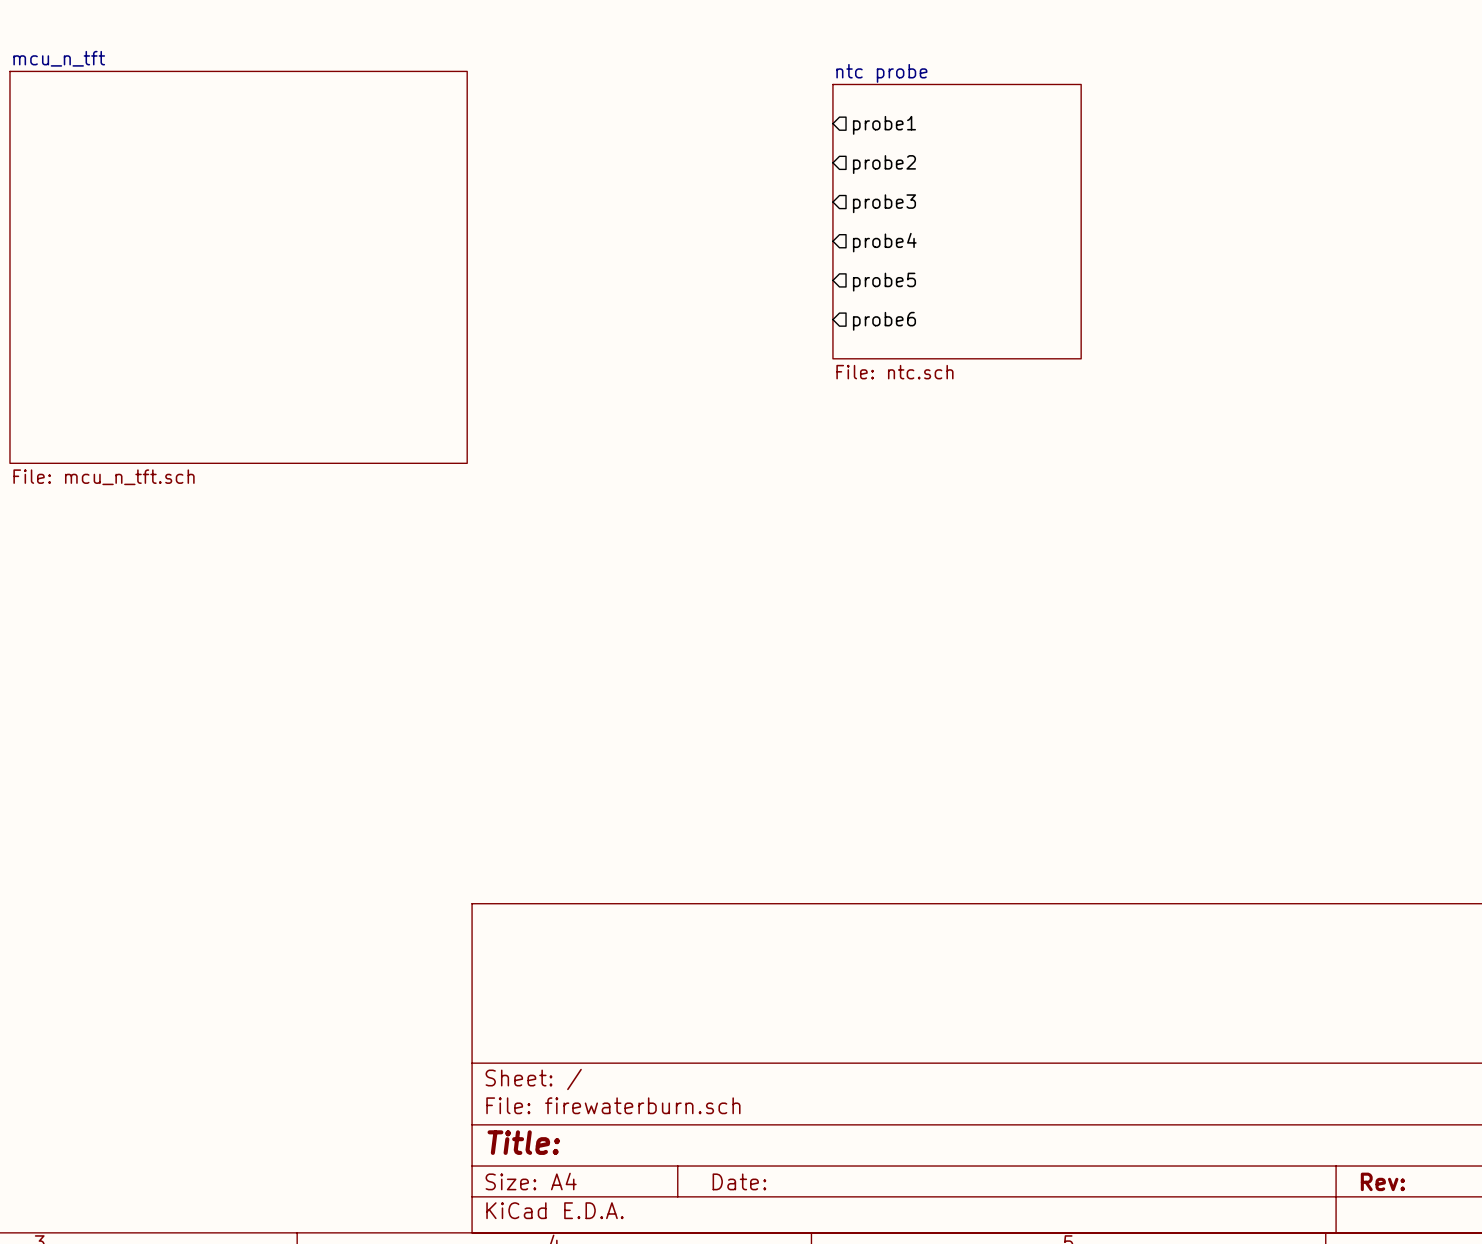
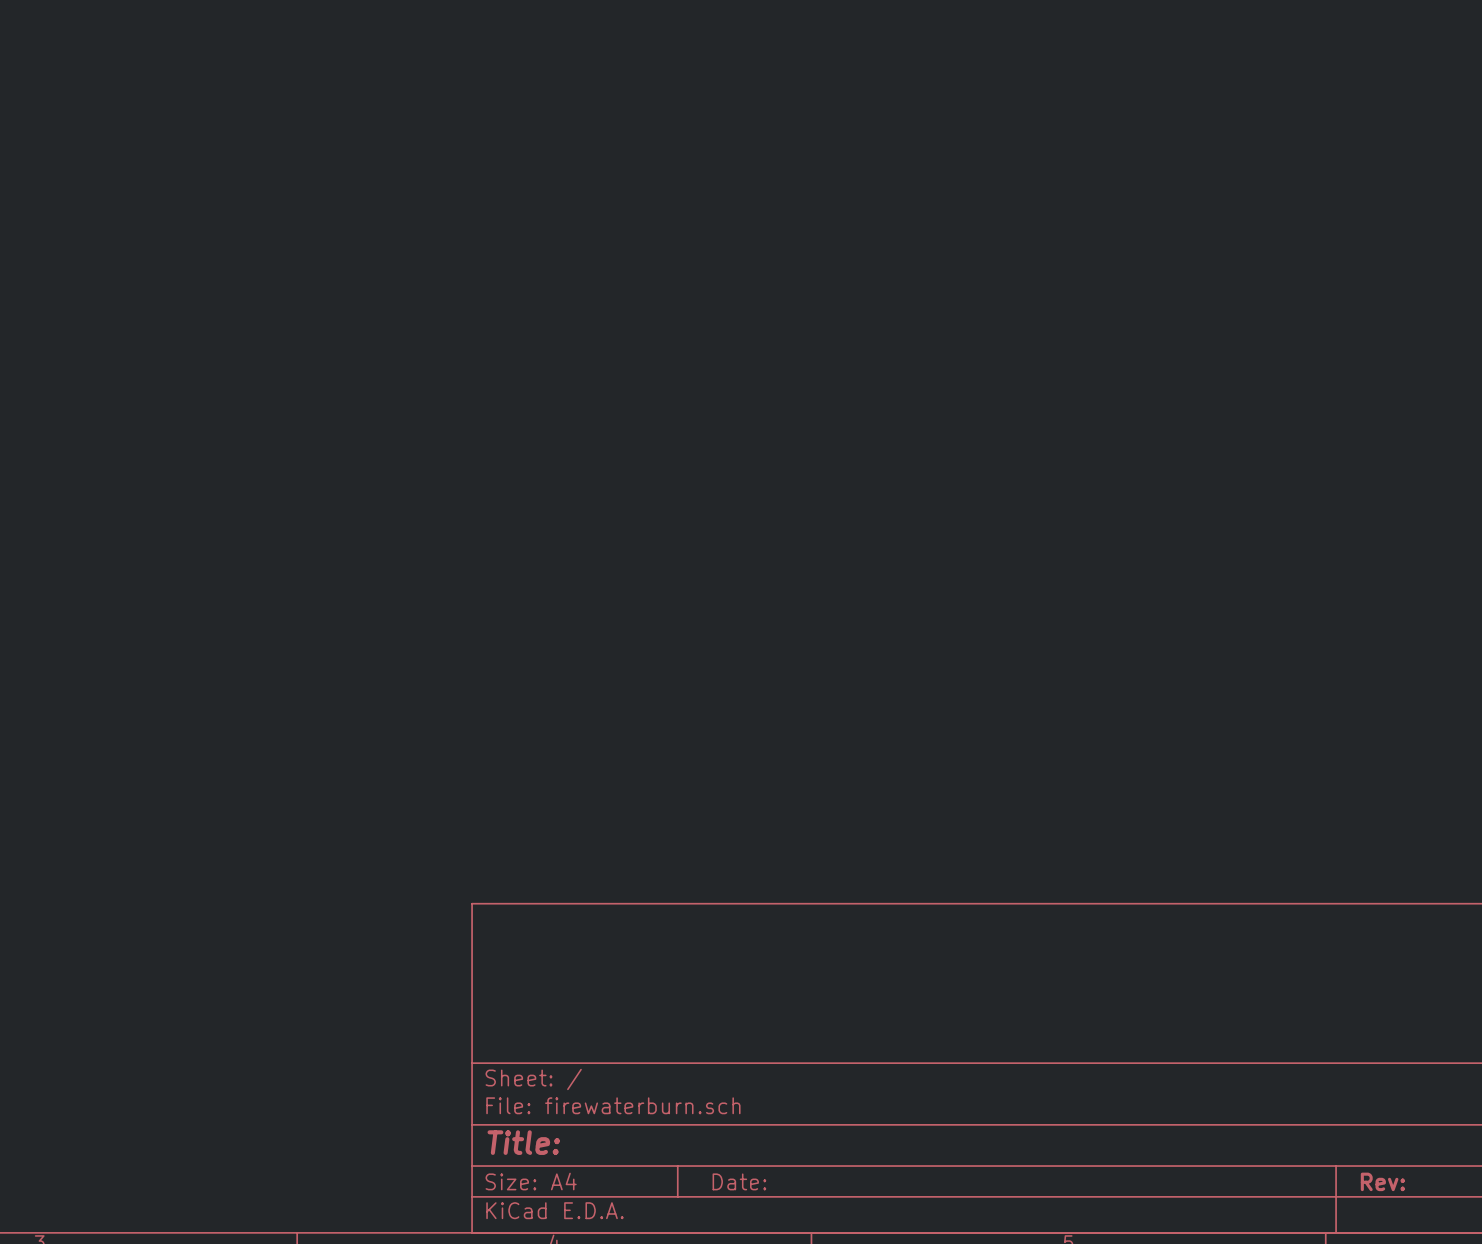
sheet pin: probe1 (884, 125) -> none
sheet pin: probe2 (884, 164) -> none
sheet pin: probe3 (884, 203) -> none
sheet ntc probe: File: ntc.sch (957, 221) -> none
sheet pin: probe4 (884, 242) -> none
sheet mcu_n_tft: File: mcu_n_tft.sch (238, 267) -> none
sheet pin: probe5 (884, 282) -> none
sheet pin: probe6 (884, 321) -> none

